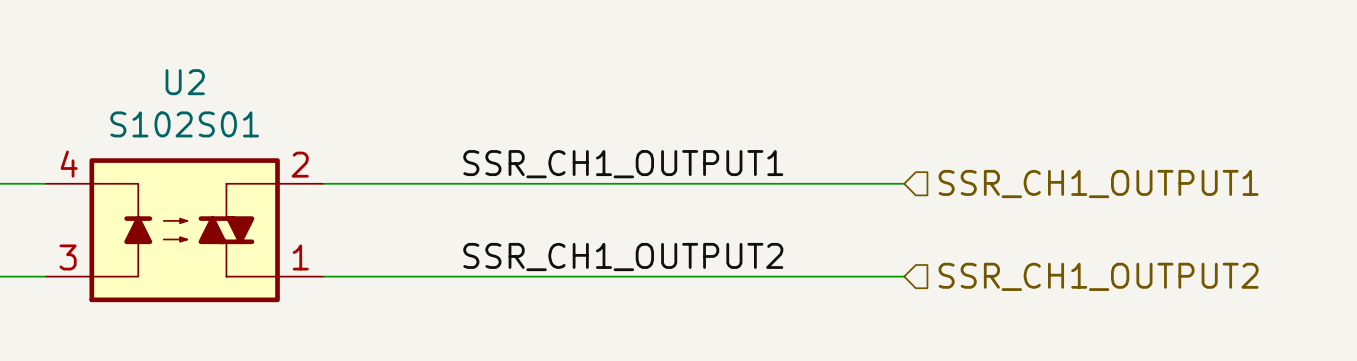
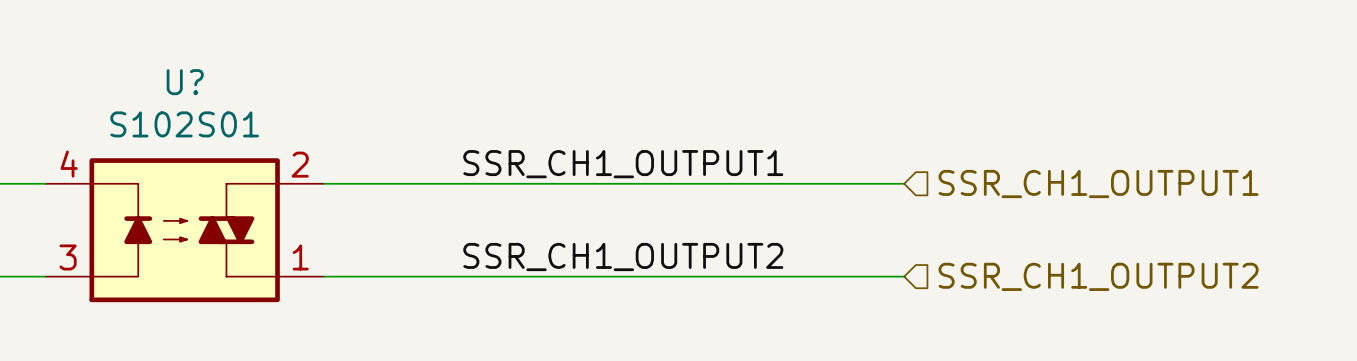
U2 name: U2 (185, 82) -> U? (185, 82)

